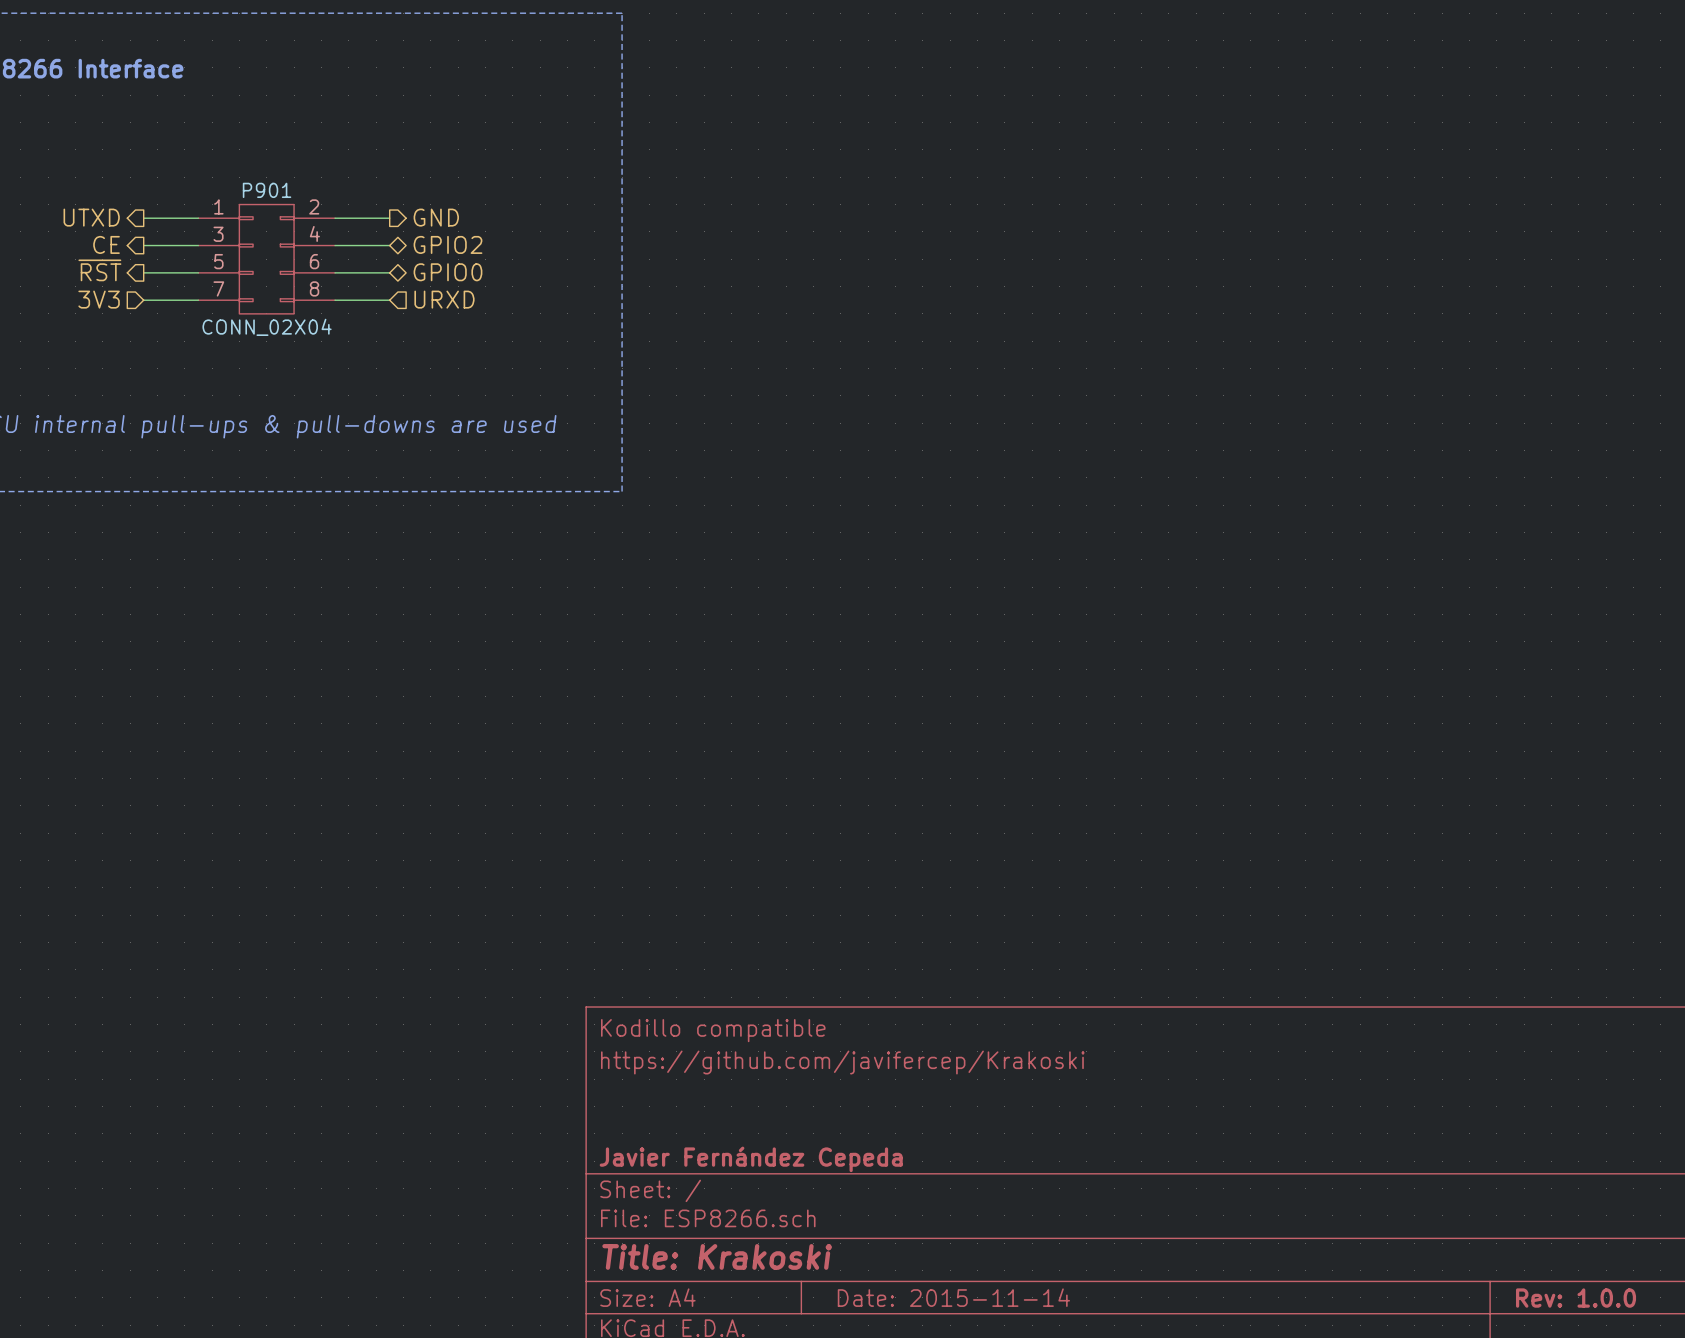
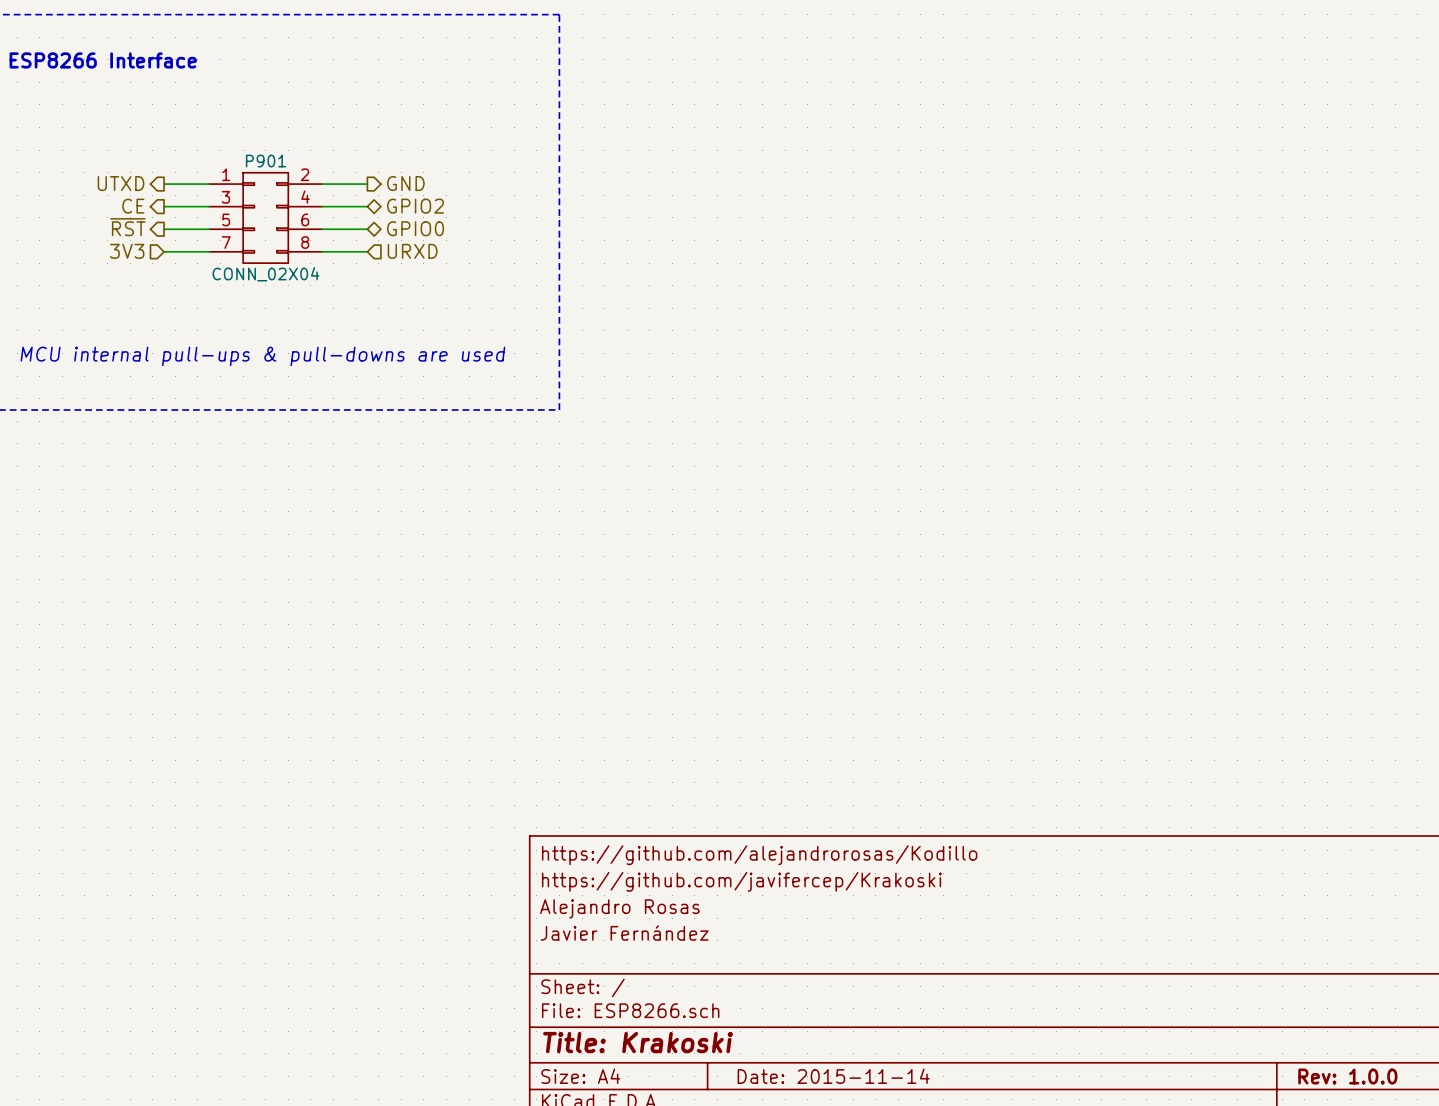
title block: Kodillo compatible (713, 1030) -> https://github.com/alejandrorosas/Kodillo (759, 855)
title block: none -> Alejandro Rosas (619, 908)
title block: Javier Fernández Cepeda (751, 1159) -> Javier Fernández (624, 933)

